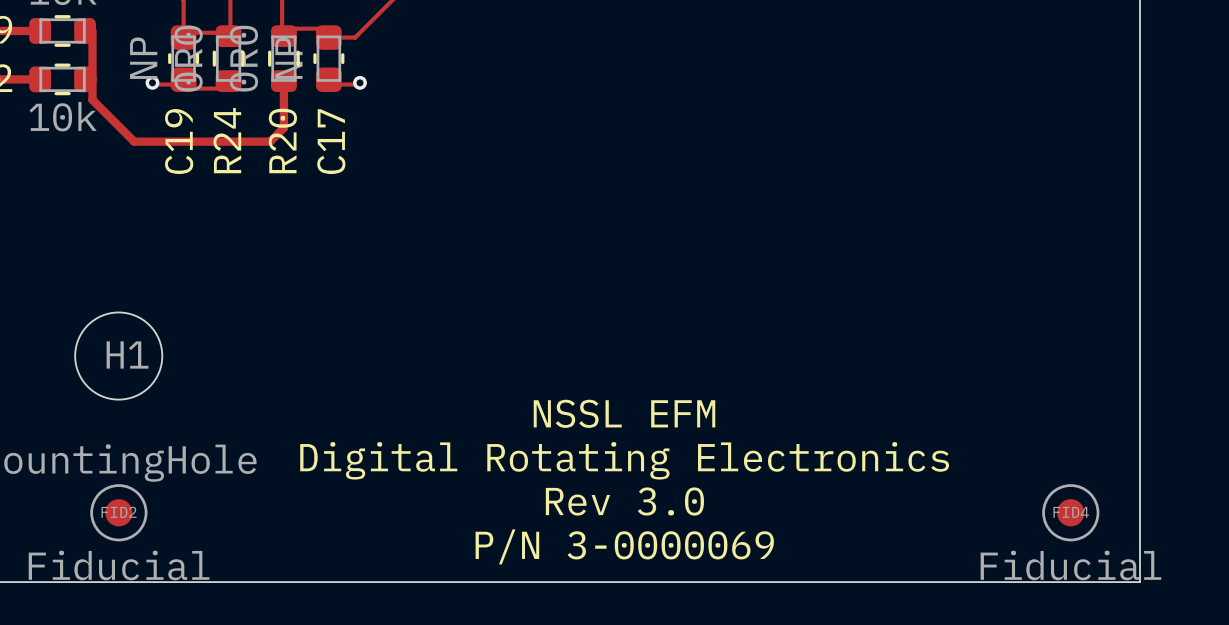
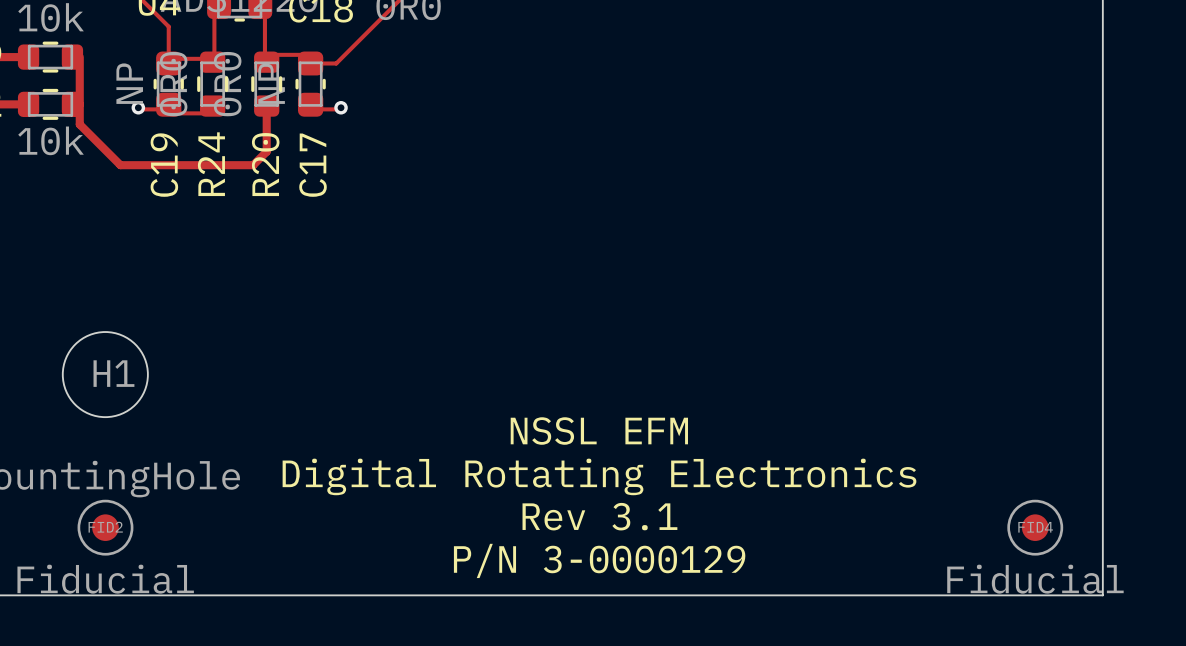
text: Rev 3.0 (624, 501) -> Rev 3.1 (599, 516)
text: P/N 3-0000069 (624, 546) -> P/N 3-0000129 (599, 560)

